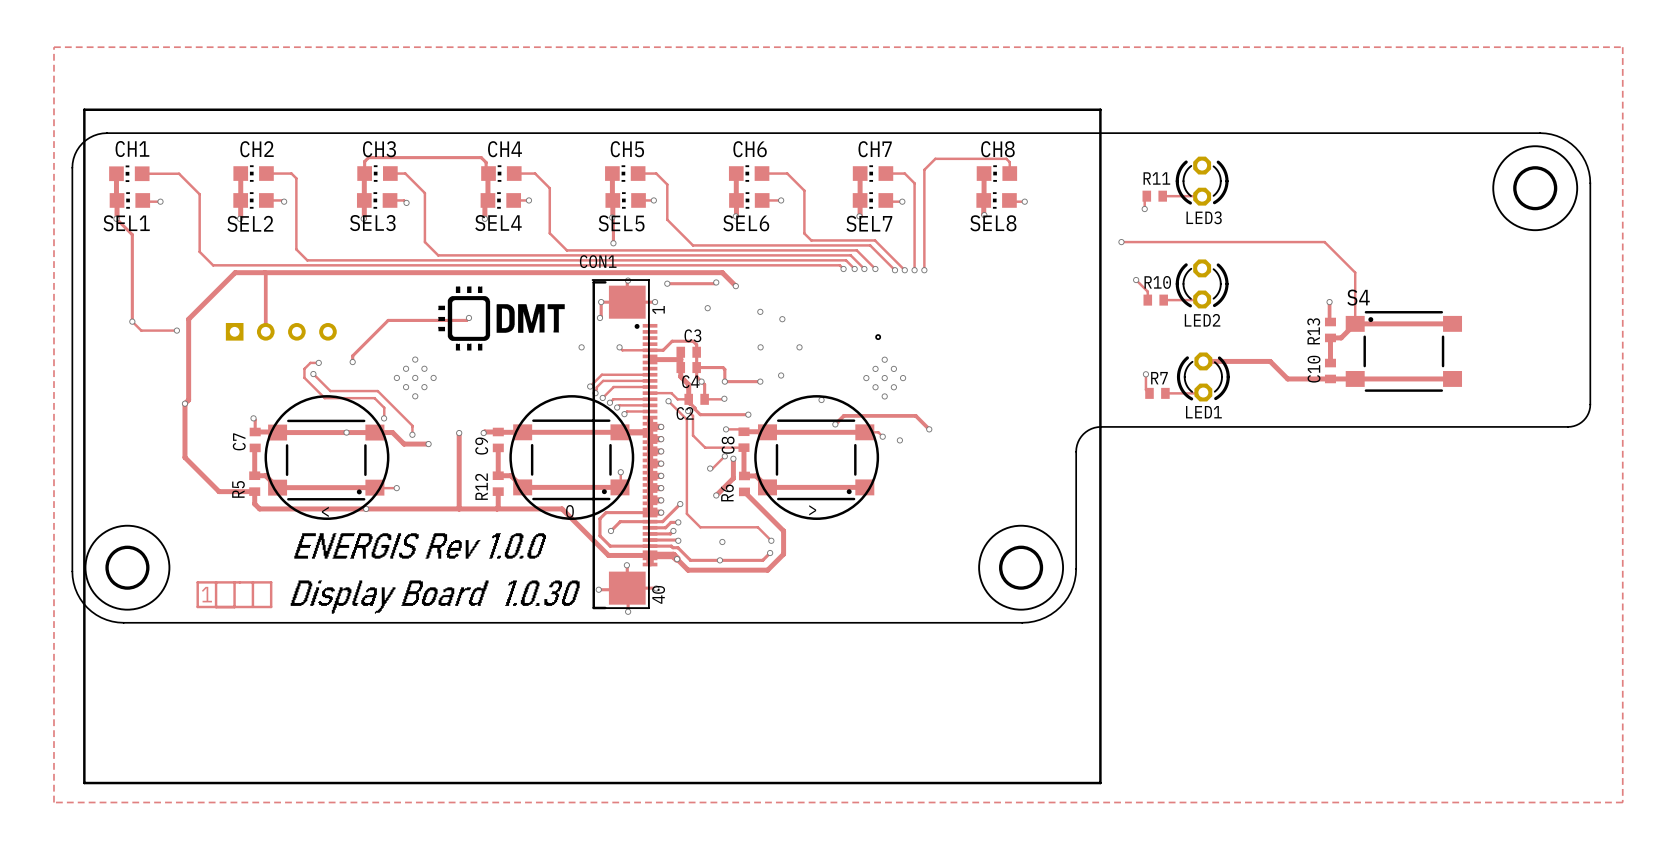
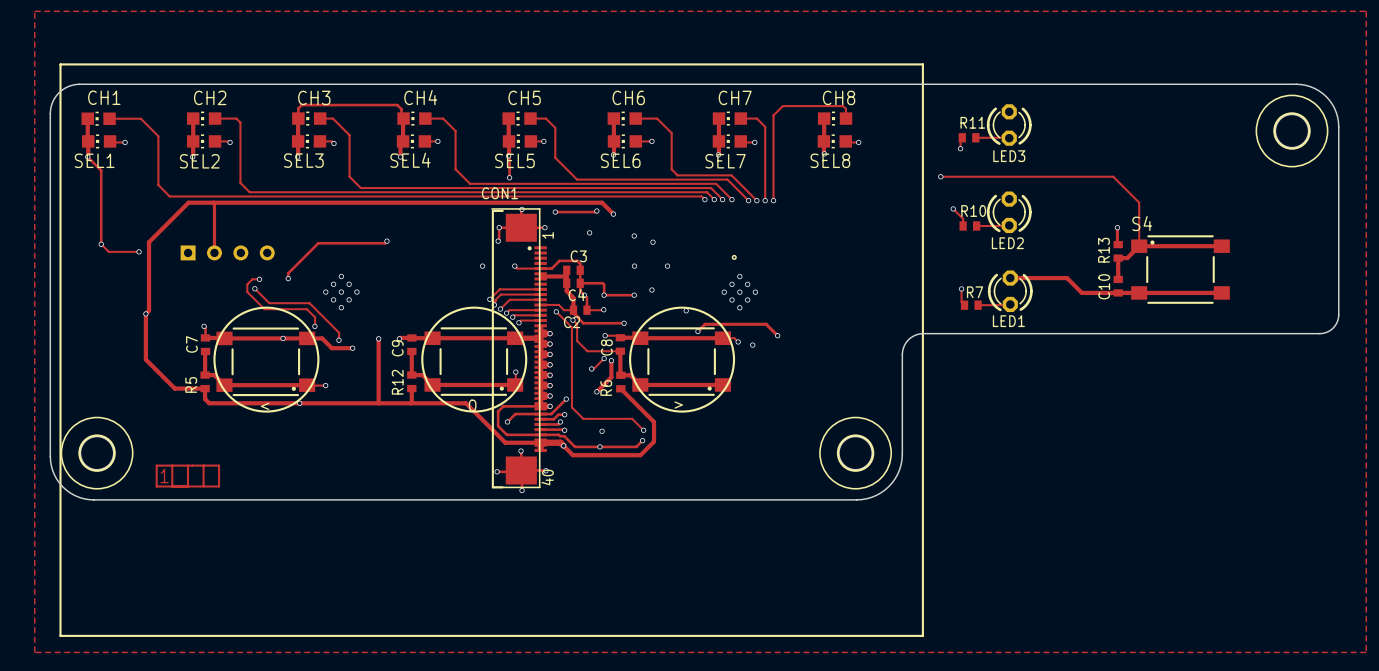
drawing: [438, 286, 565, 351] -> none
drawing: [294, 533, 546, 559] -> none
drawing: [290, 580, 489, 614] -> none
drawing: [505, 580, 580, 606] -> none

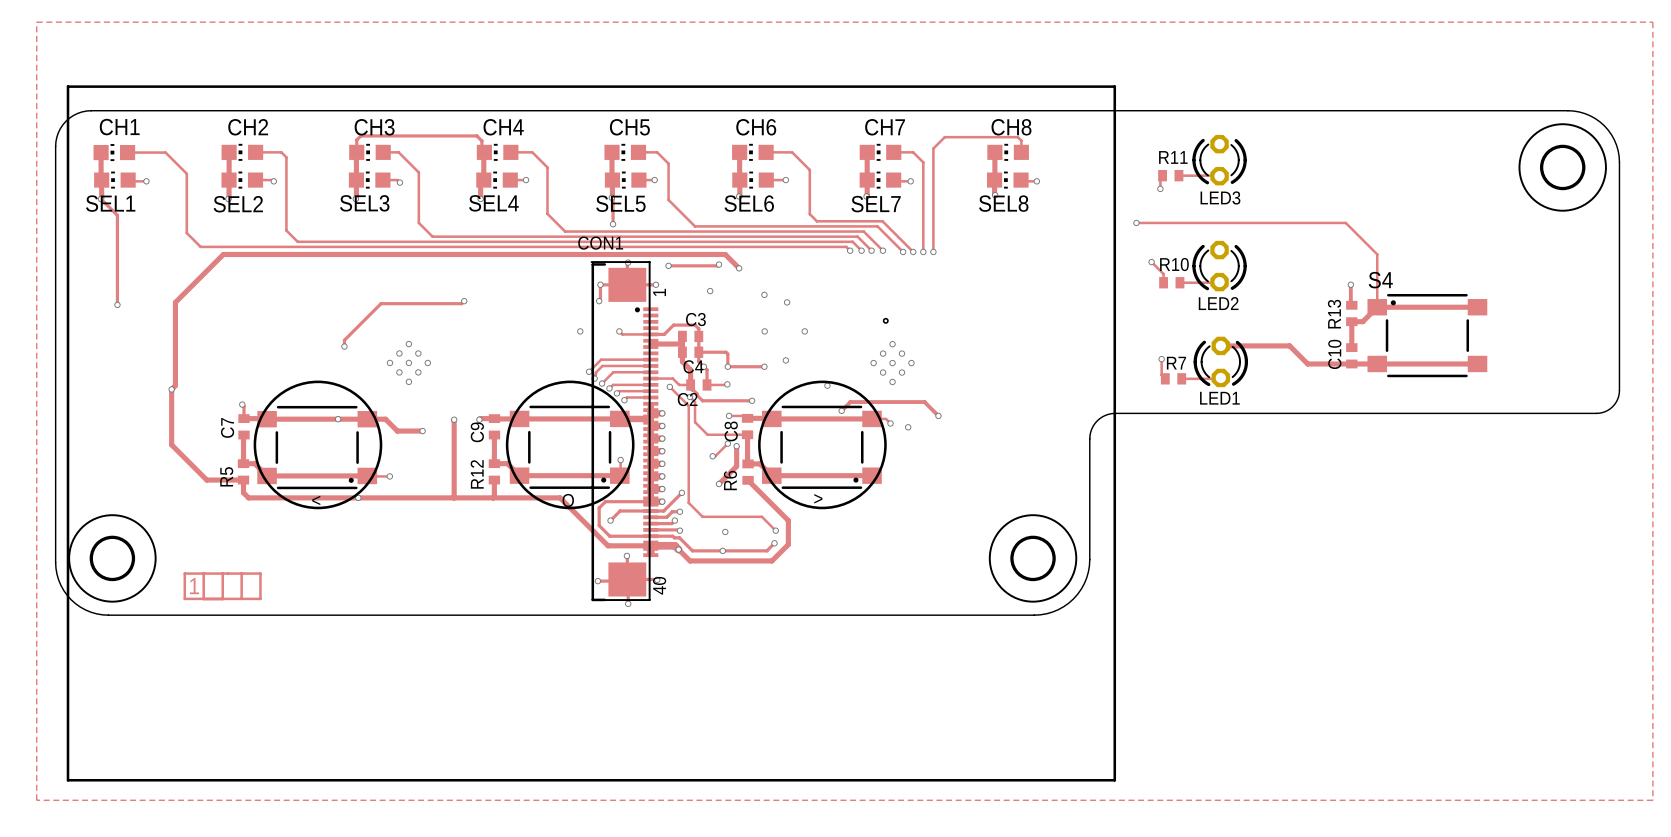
track: (213, 202) (214, 252) -> none
track: (101, 244) (108, 251) (139, 251) -> none
via: (139, 251) -> none
part: (227, 252) -> none
track: (259, 279) (252, 279) (247, 284) (247, 291) (264, 309) (306, 309) (315, 317) (314, 326) -> none
via: (259, 279) -> none
track: (254, 288) (269, 303) (309, 303) (339, 332) (338, 340) -> none
via: (254, 288) -> none
via: (314, 326) -> none
via: (338, 340) -> none

